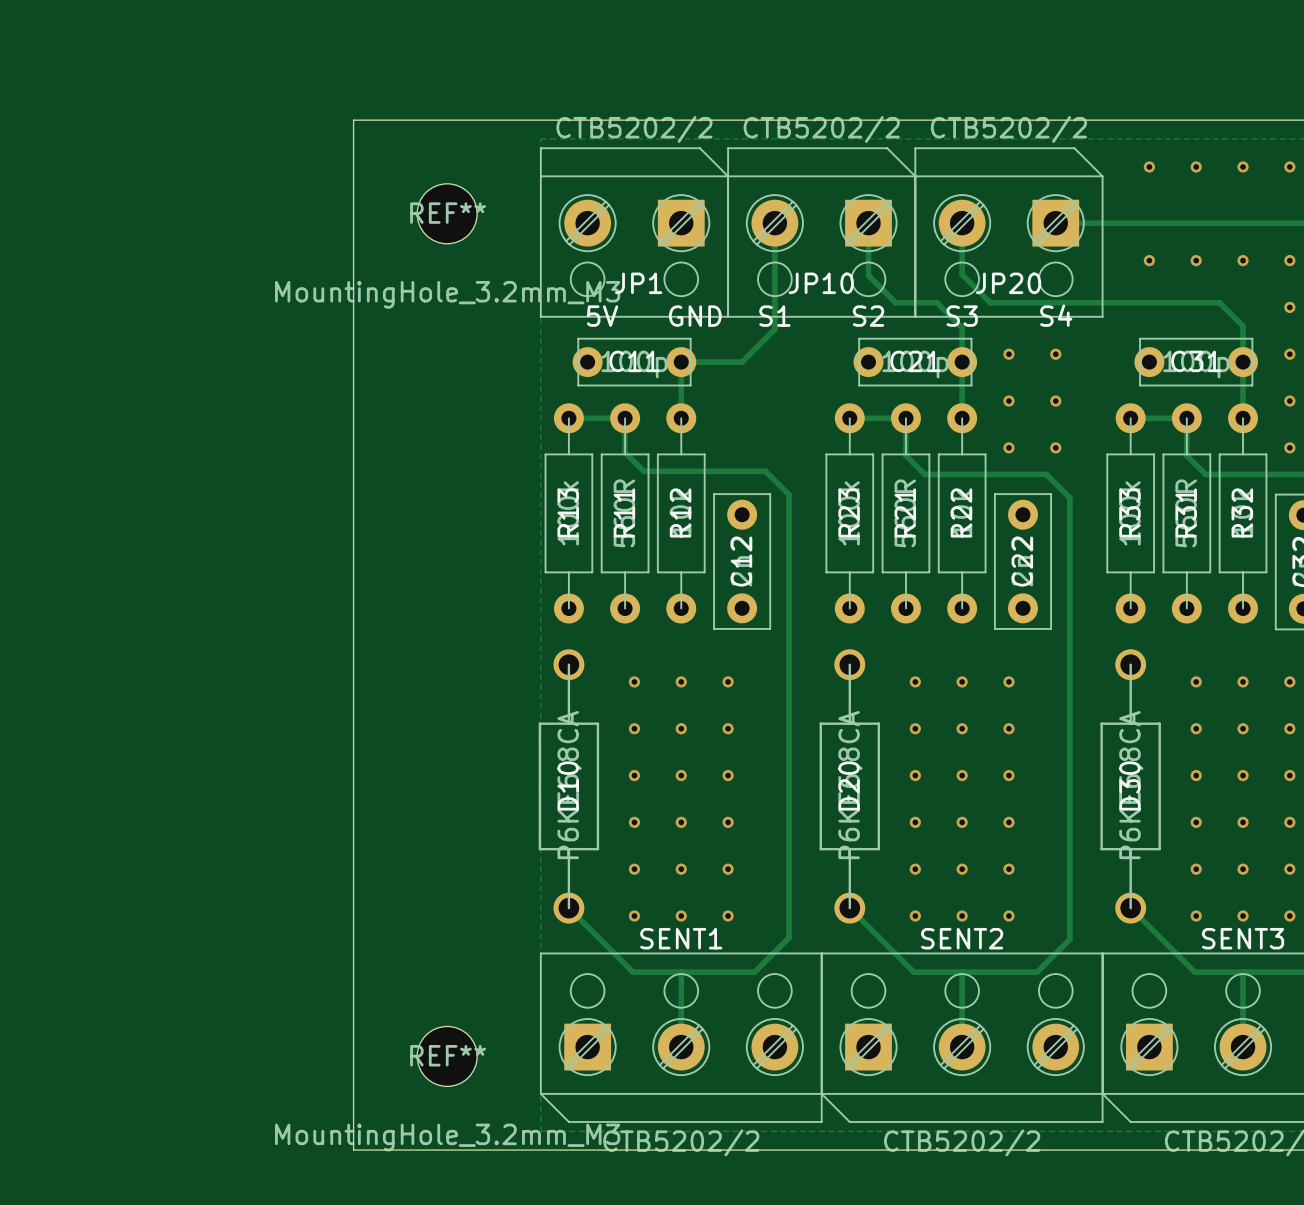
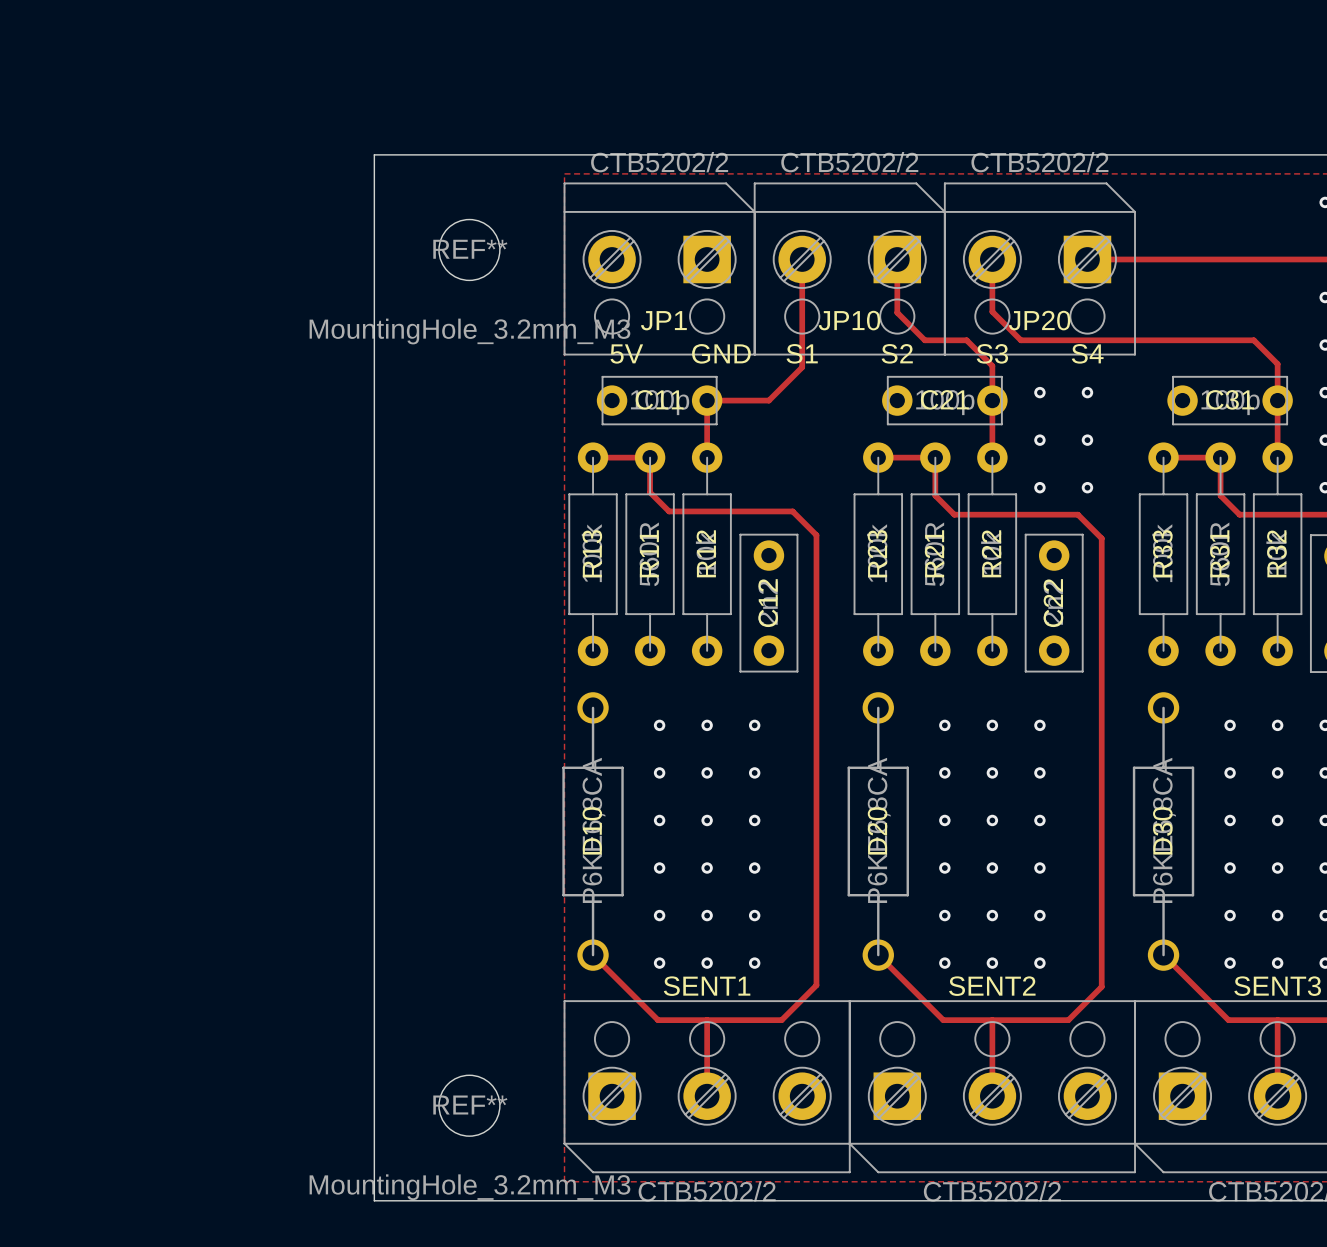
via: (1149, 166) -> none
via: (1196, 166) -> none
via: (1243, 166) -> none
via: (1149, 260) -> none
via: (1196, 260) -> none
via: (1243, 260) -> none

